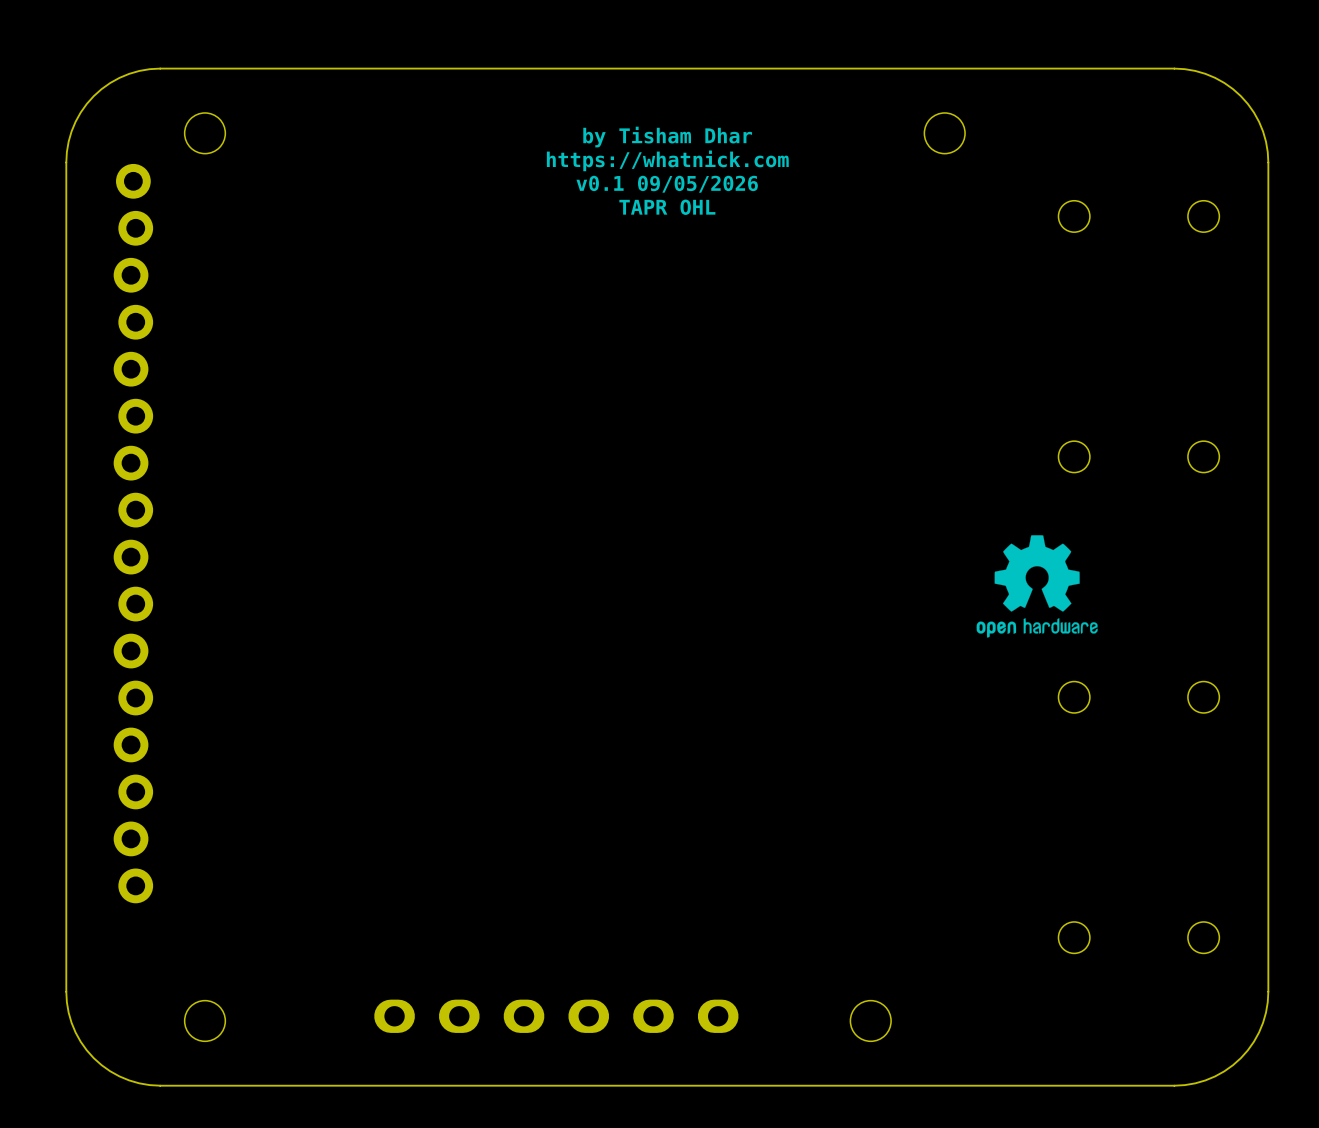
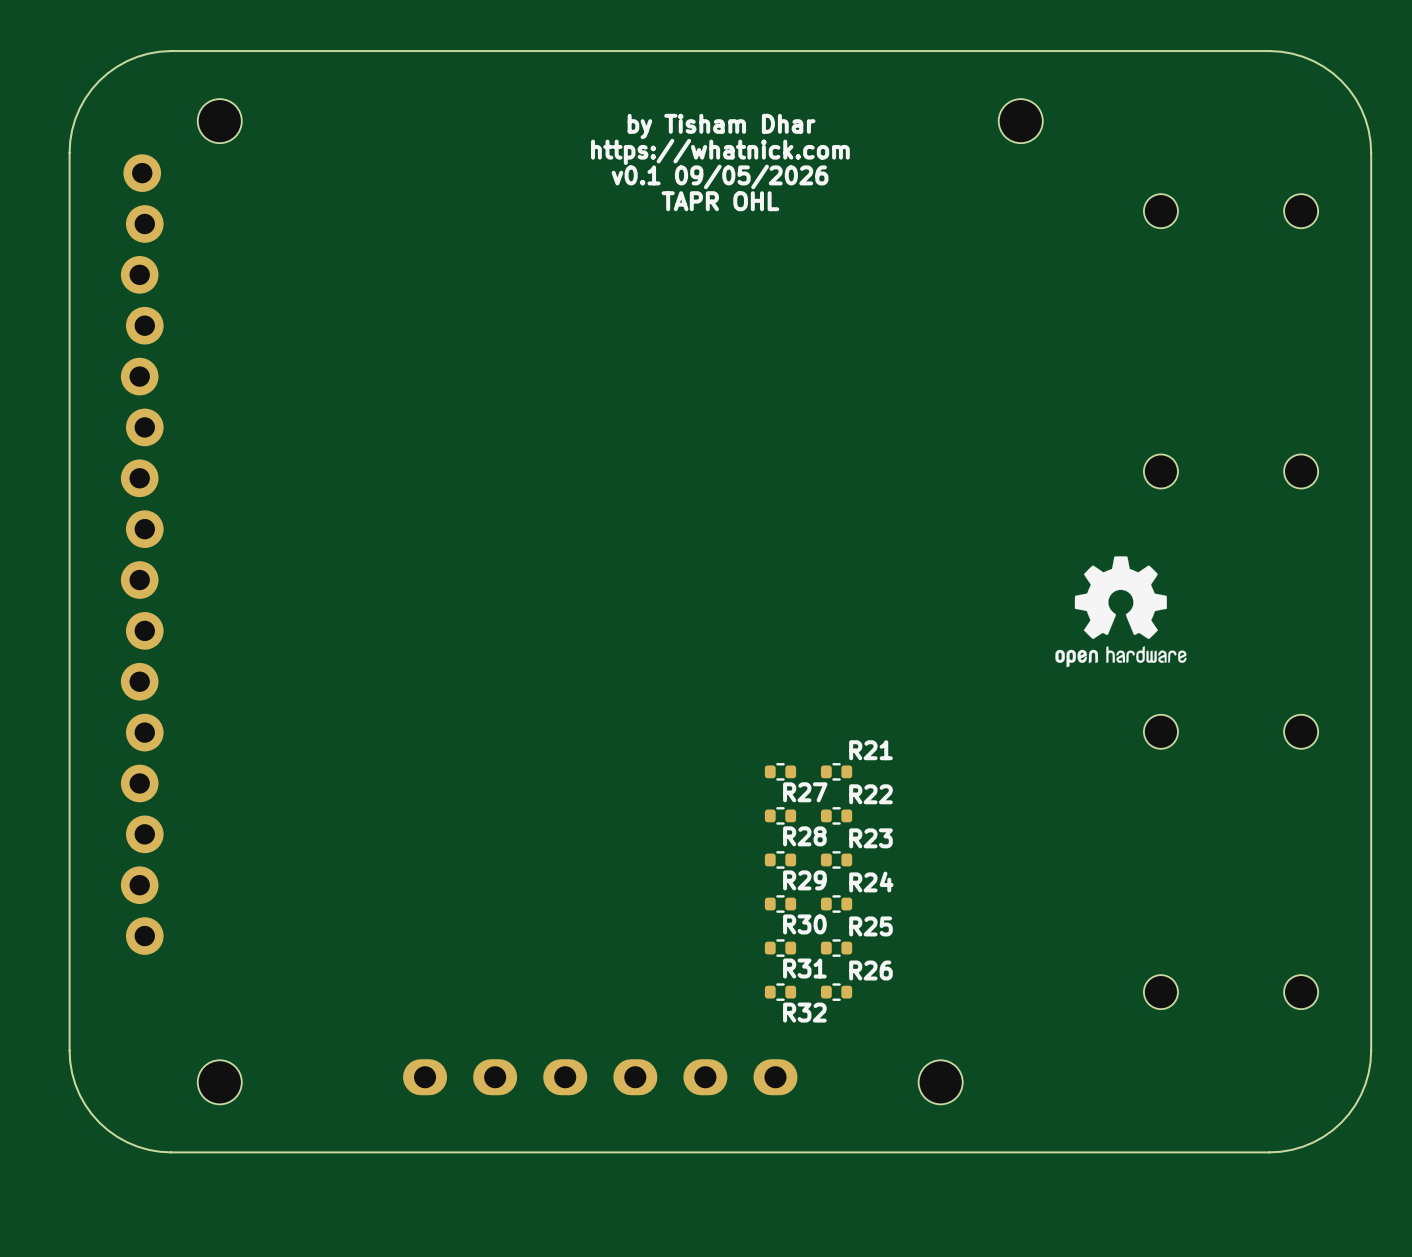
R27: none -> (780, 771)
R21: none -> (836, 771)
R28: none -> (780, 815)
R22: none -> (836, 815)
R29: none -> (780, 859)
R23: none -> (836, 859)
R30: none -> (780, 904)
R24: none -> (836, 904)
R31: none -> (780, 948)
R25: none -> (836, 948)
R32: none -> (780, 992)
R26: none -> (836, 992)

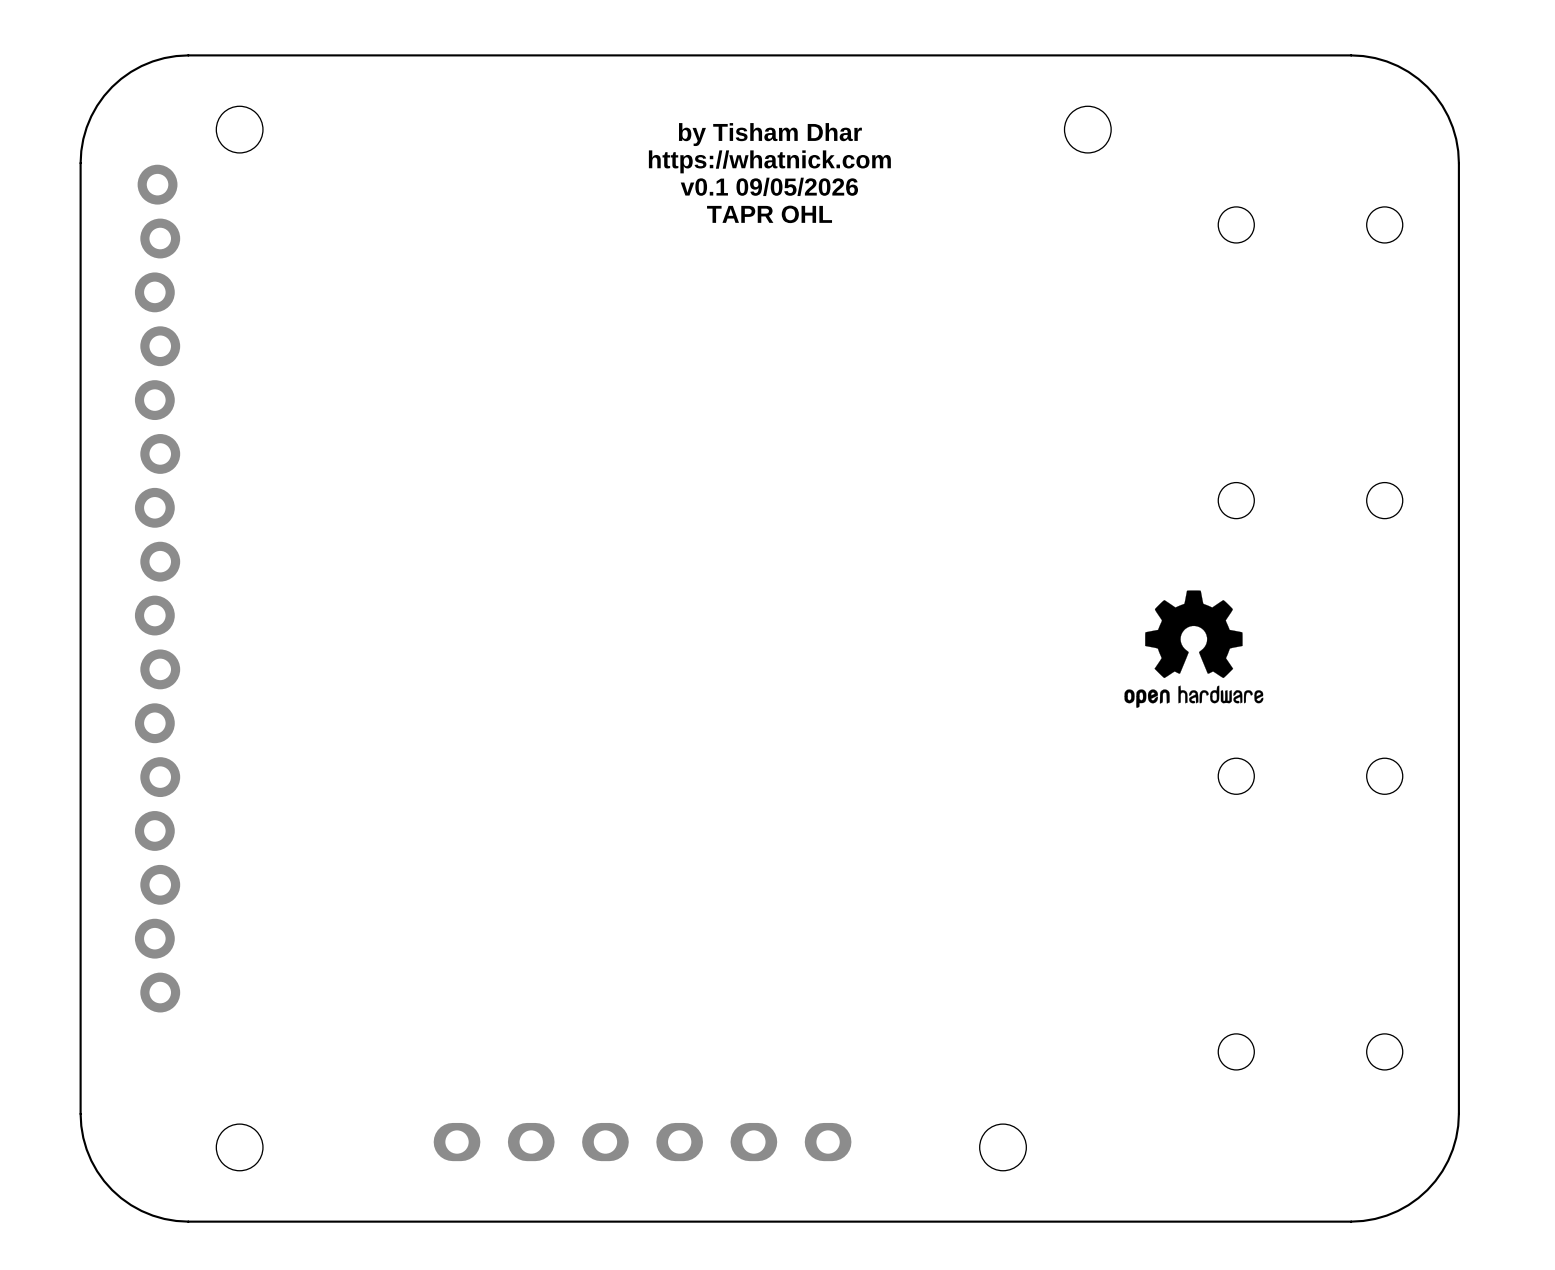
R27: (780, 771) -> none
R21: (836, 771) -> none
R28: (780, 815) -> none
R22: (836, 815) -> none
R29: (780, 859) -> none
R23: (836, 859) -> none
R30: (780, 904) -> none
R24: (836, 904) -> none
R31: (780, 948) -> none
R25: (836, 948) -> none
R32: (780, 992) -> none
R26: (836, 992) -> none

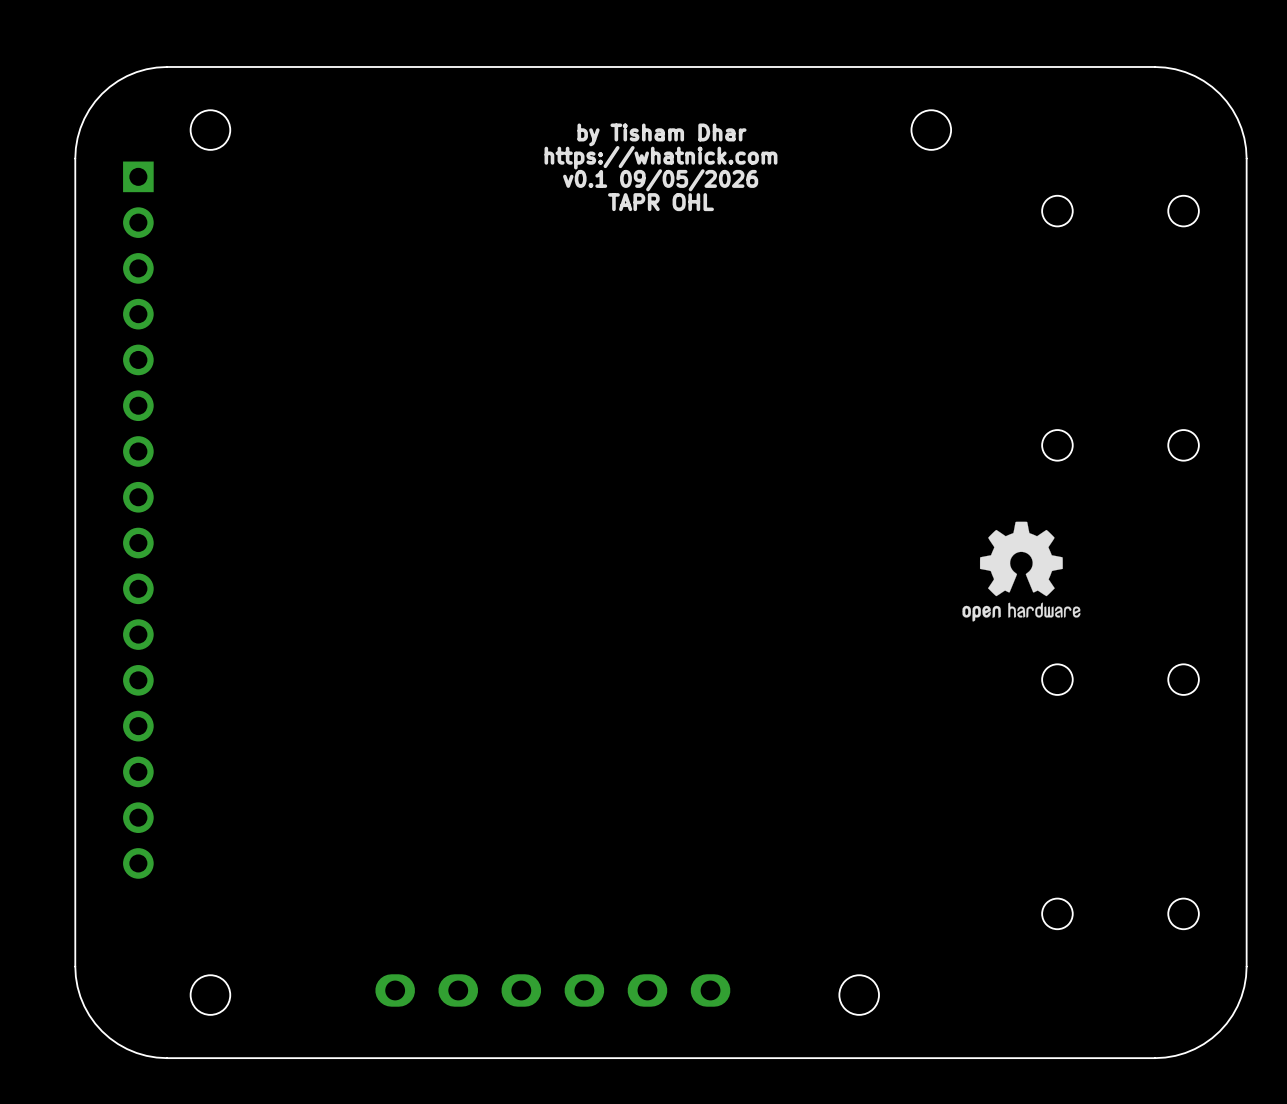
part footprint: [134, 164, 181, 1013] -> [123, 161, 154, 879]

